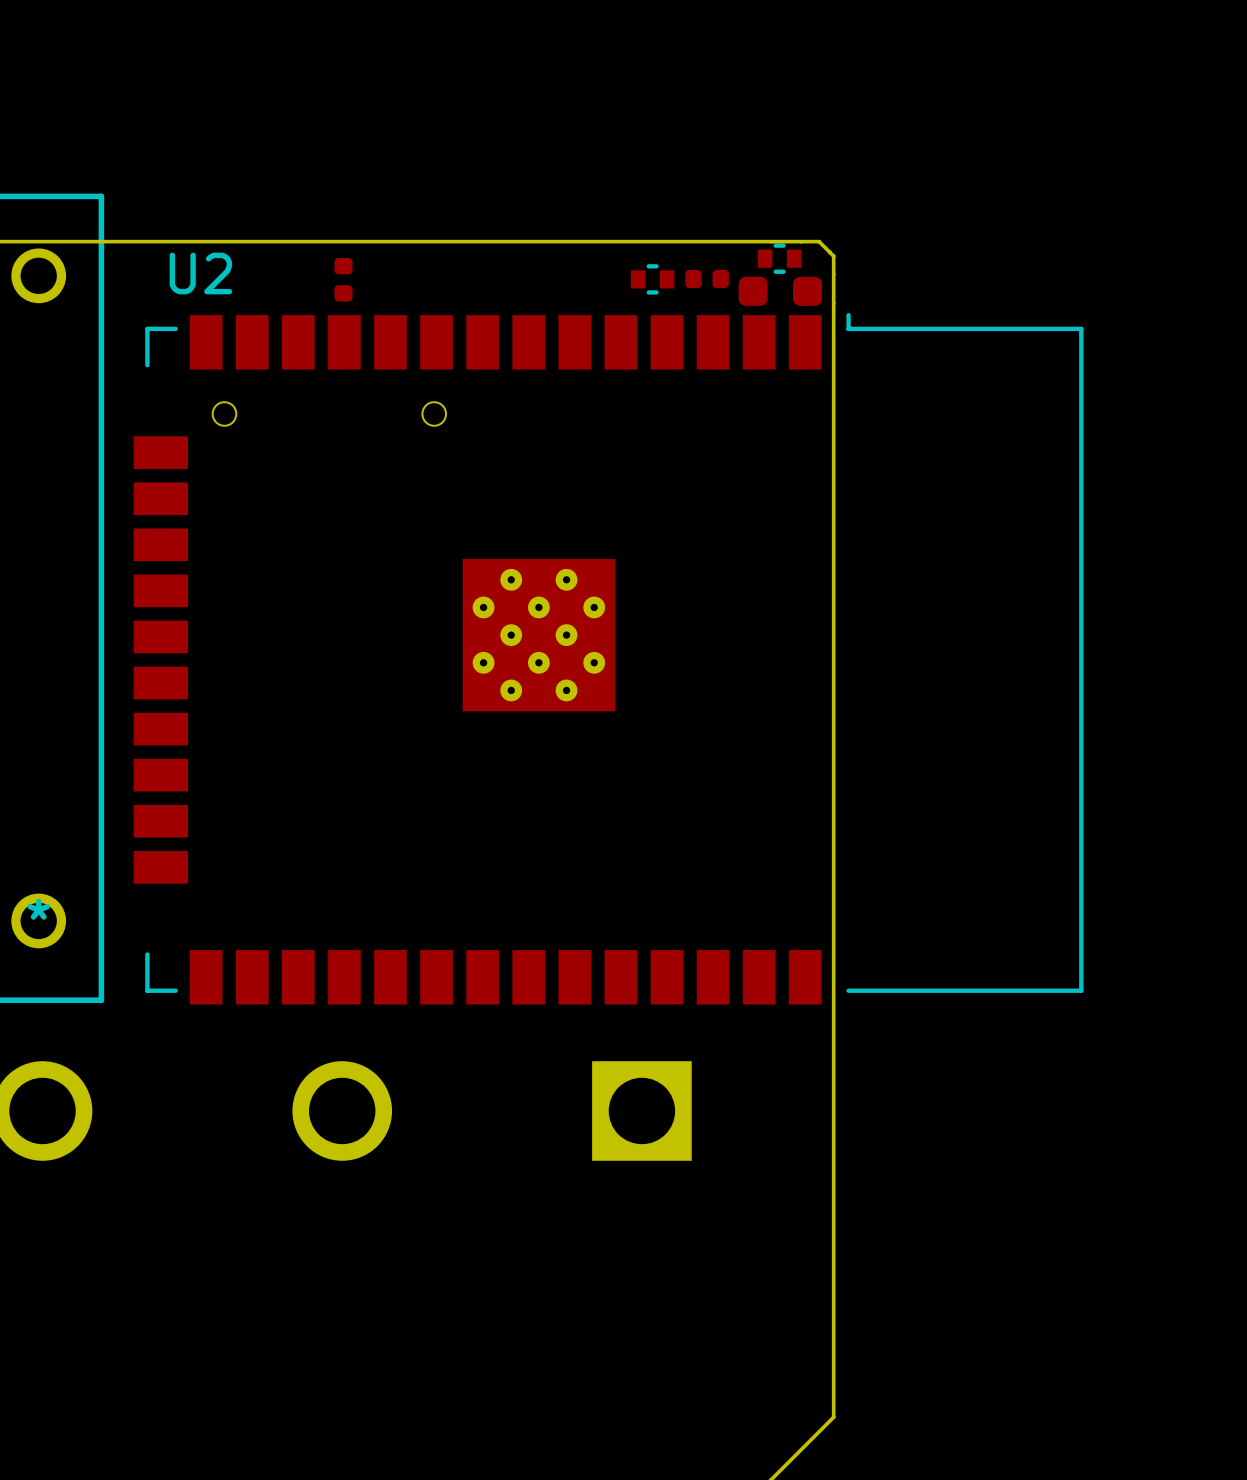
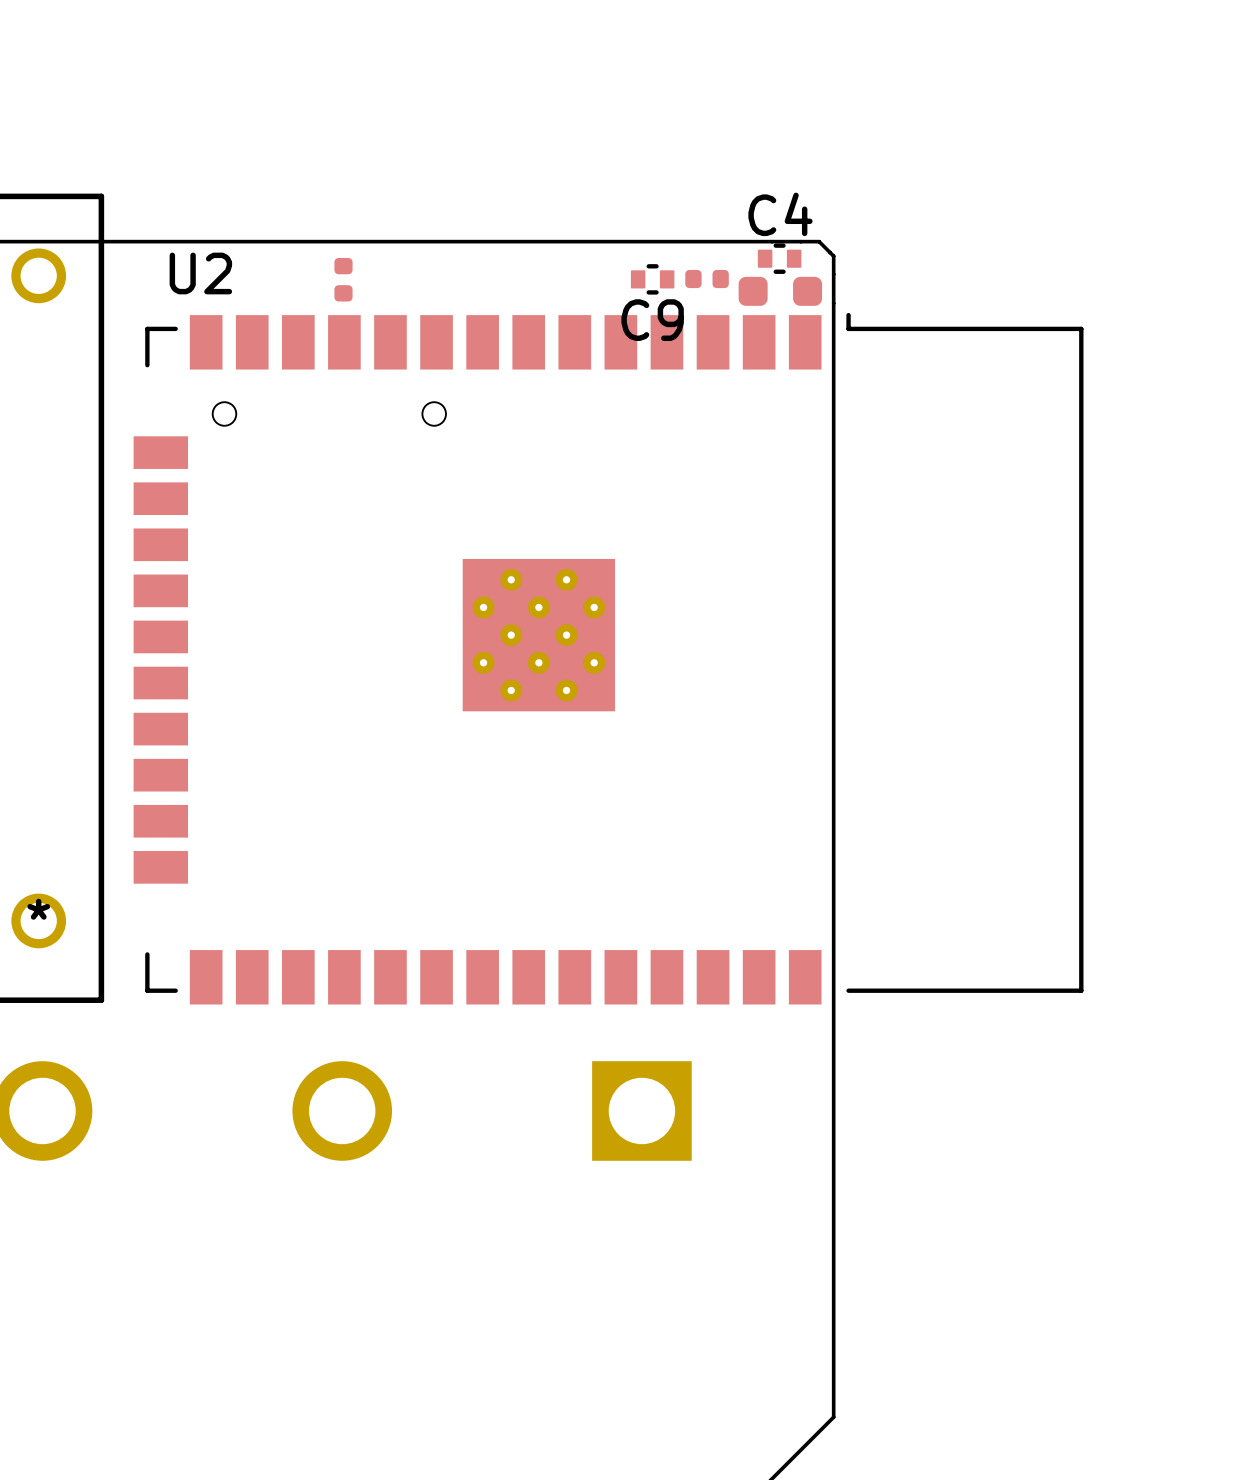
C4 name: none -> C4 (780, 214)
C9 name: none -> C9 (652, 320)

